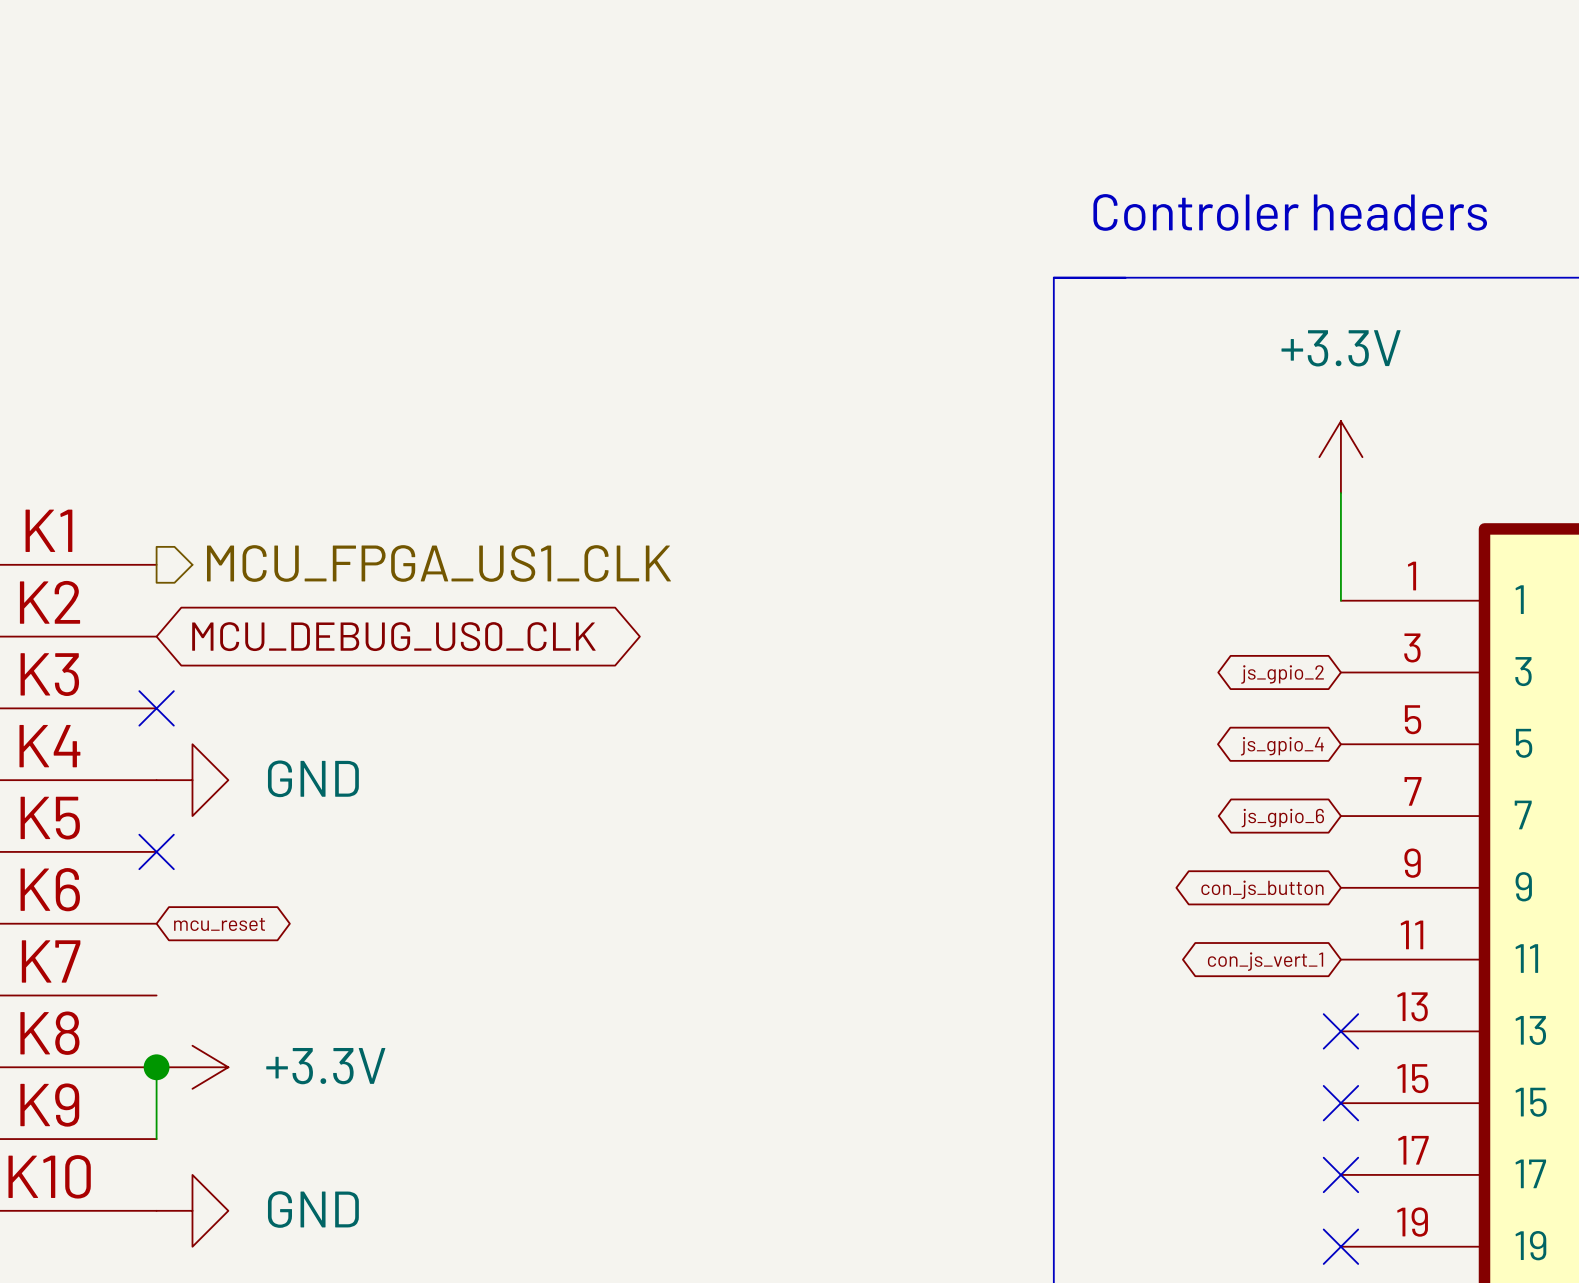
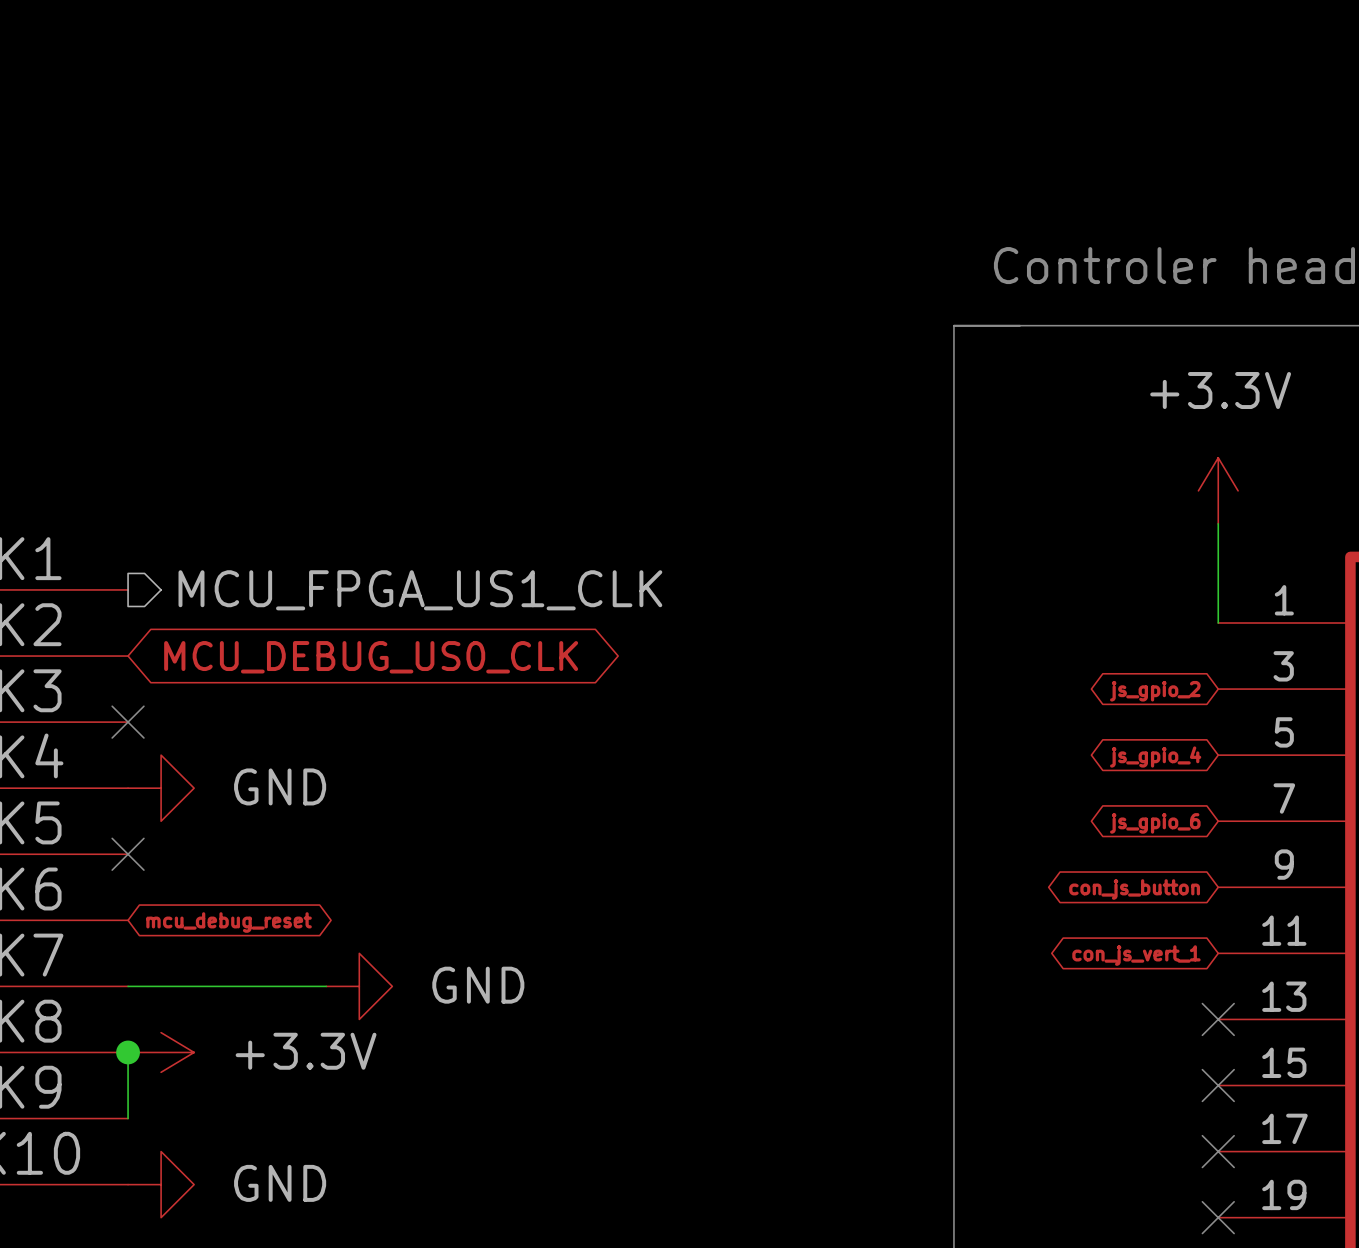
global label: mcu_reset (219, 924) -> mcu_debug_reset (229, 922)
wire: none -> (128, 986) (326, 986)
power symbol: none -> GND (359, 986)

